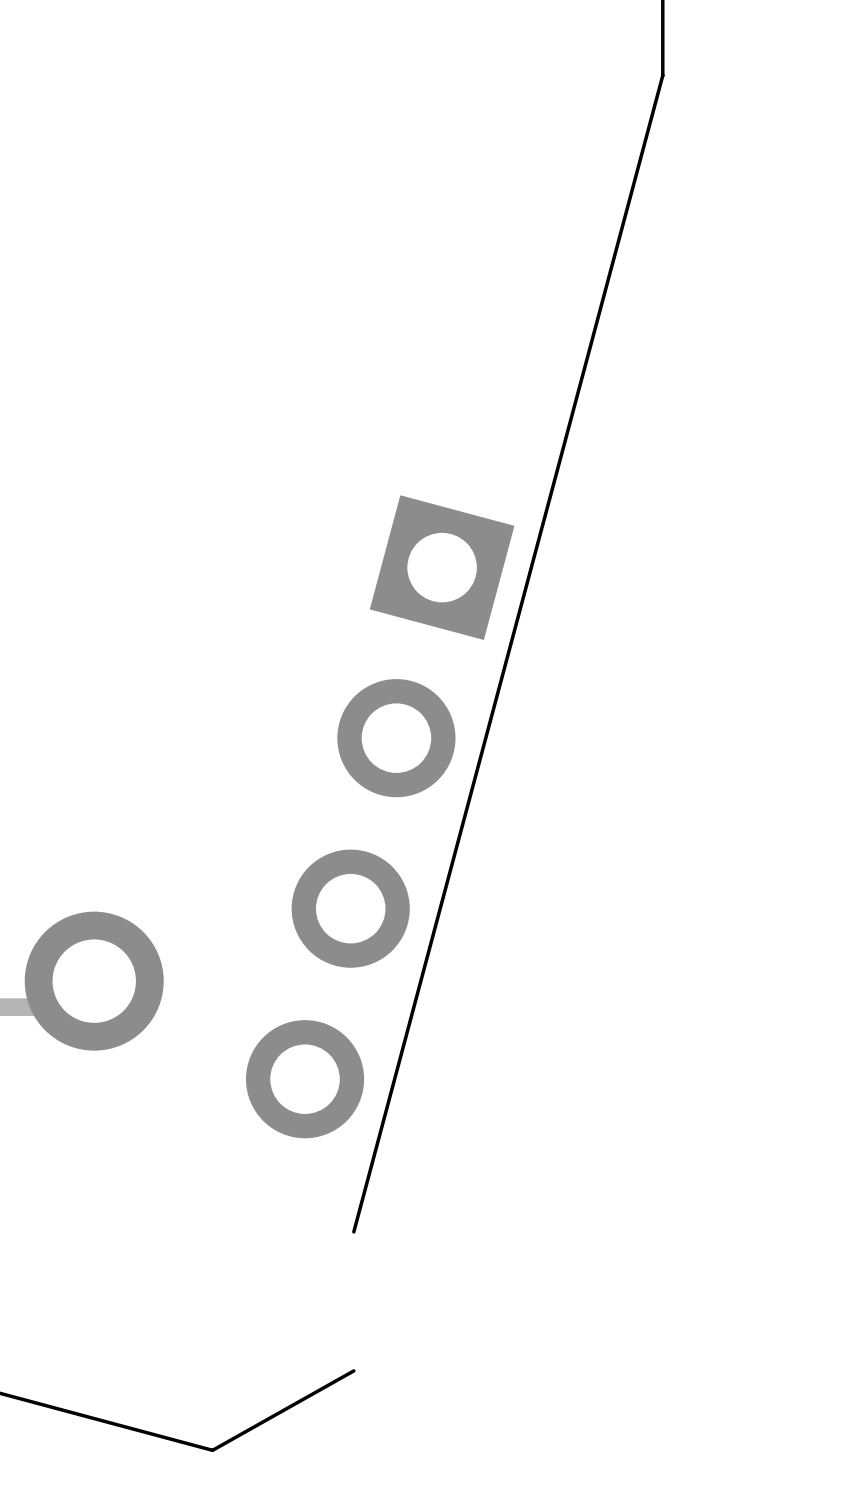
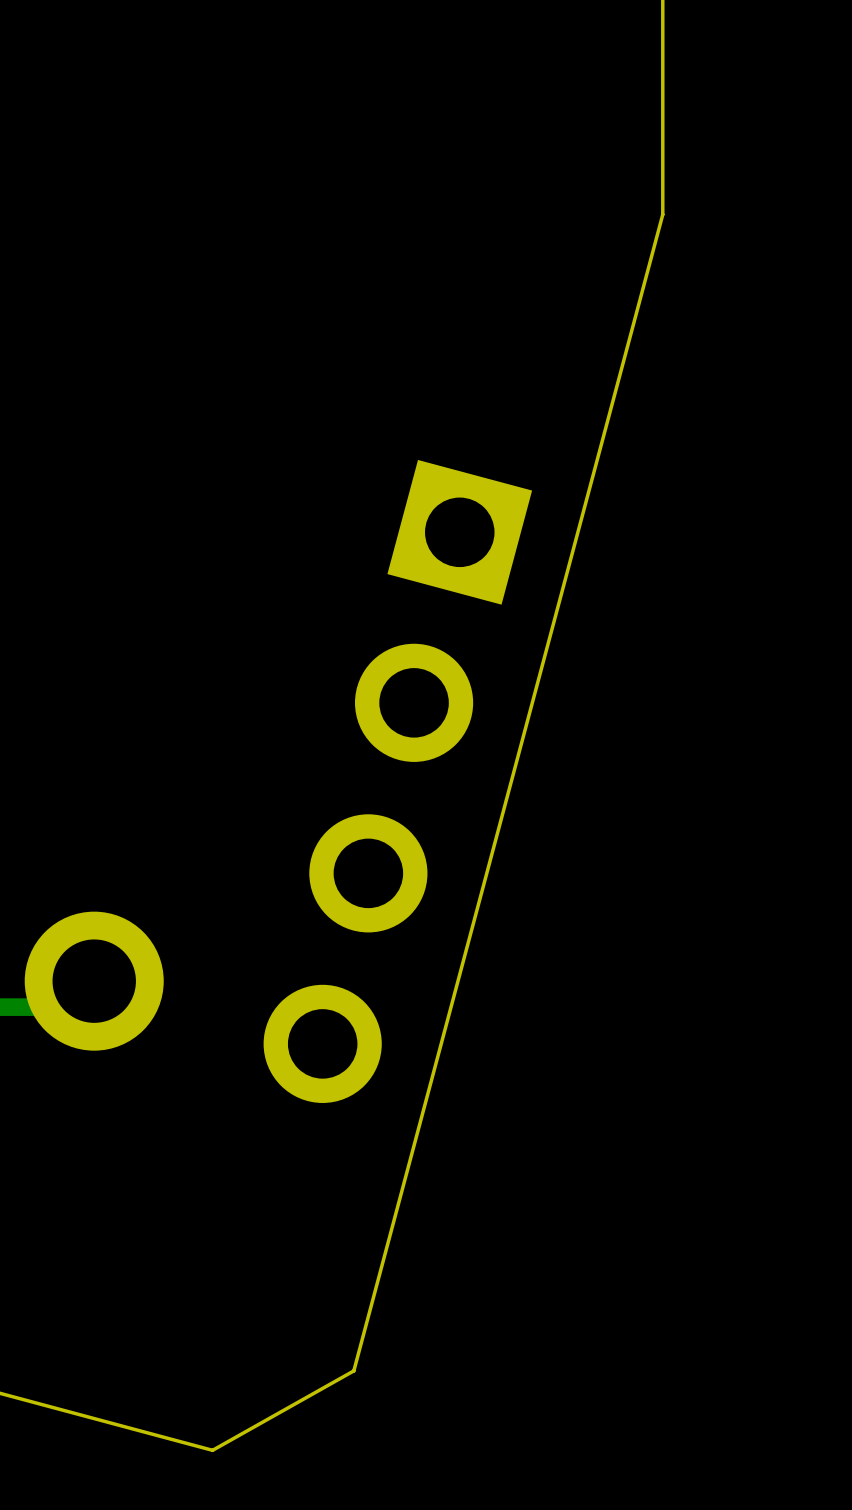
board edge: (662, 75) (353, 1231) -> (662, 75) (662, 214) (353, 1370)
part position: (380, 816) -> (397, 781)

